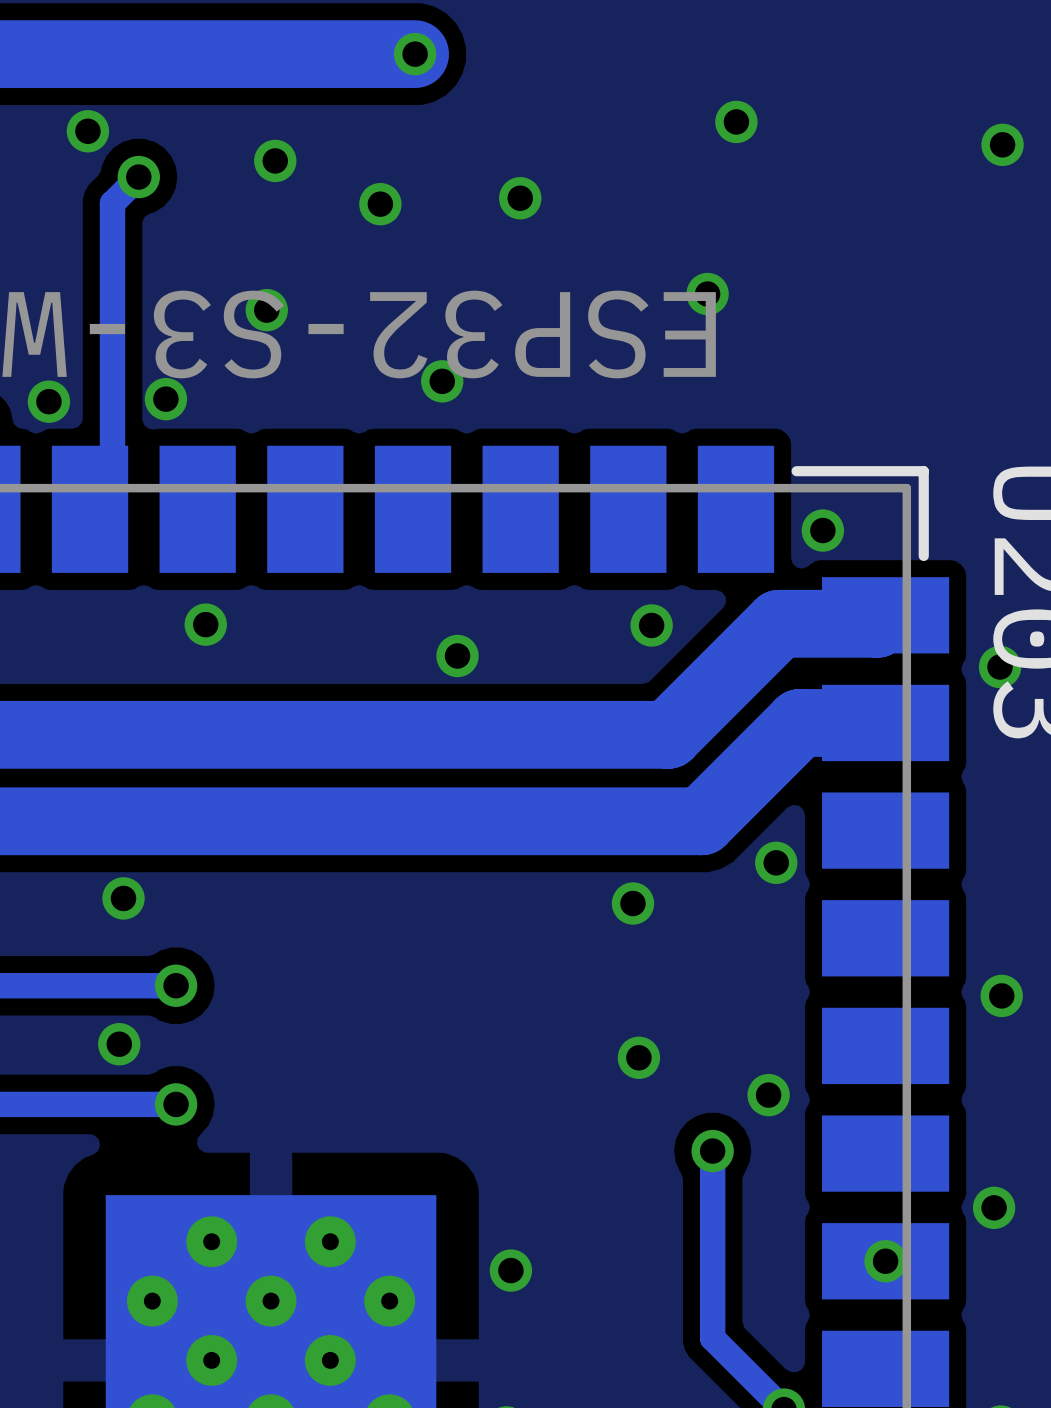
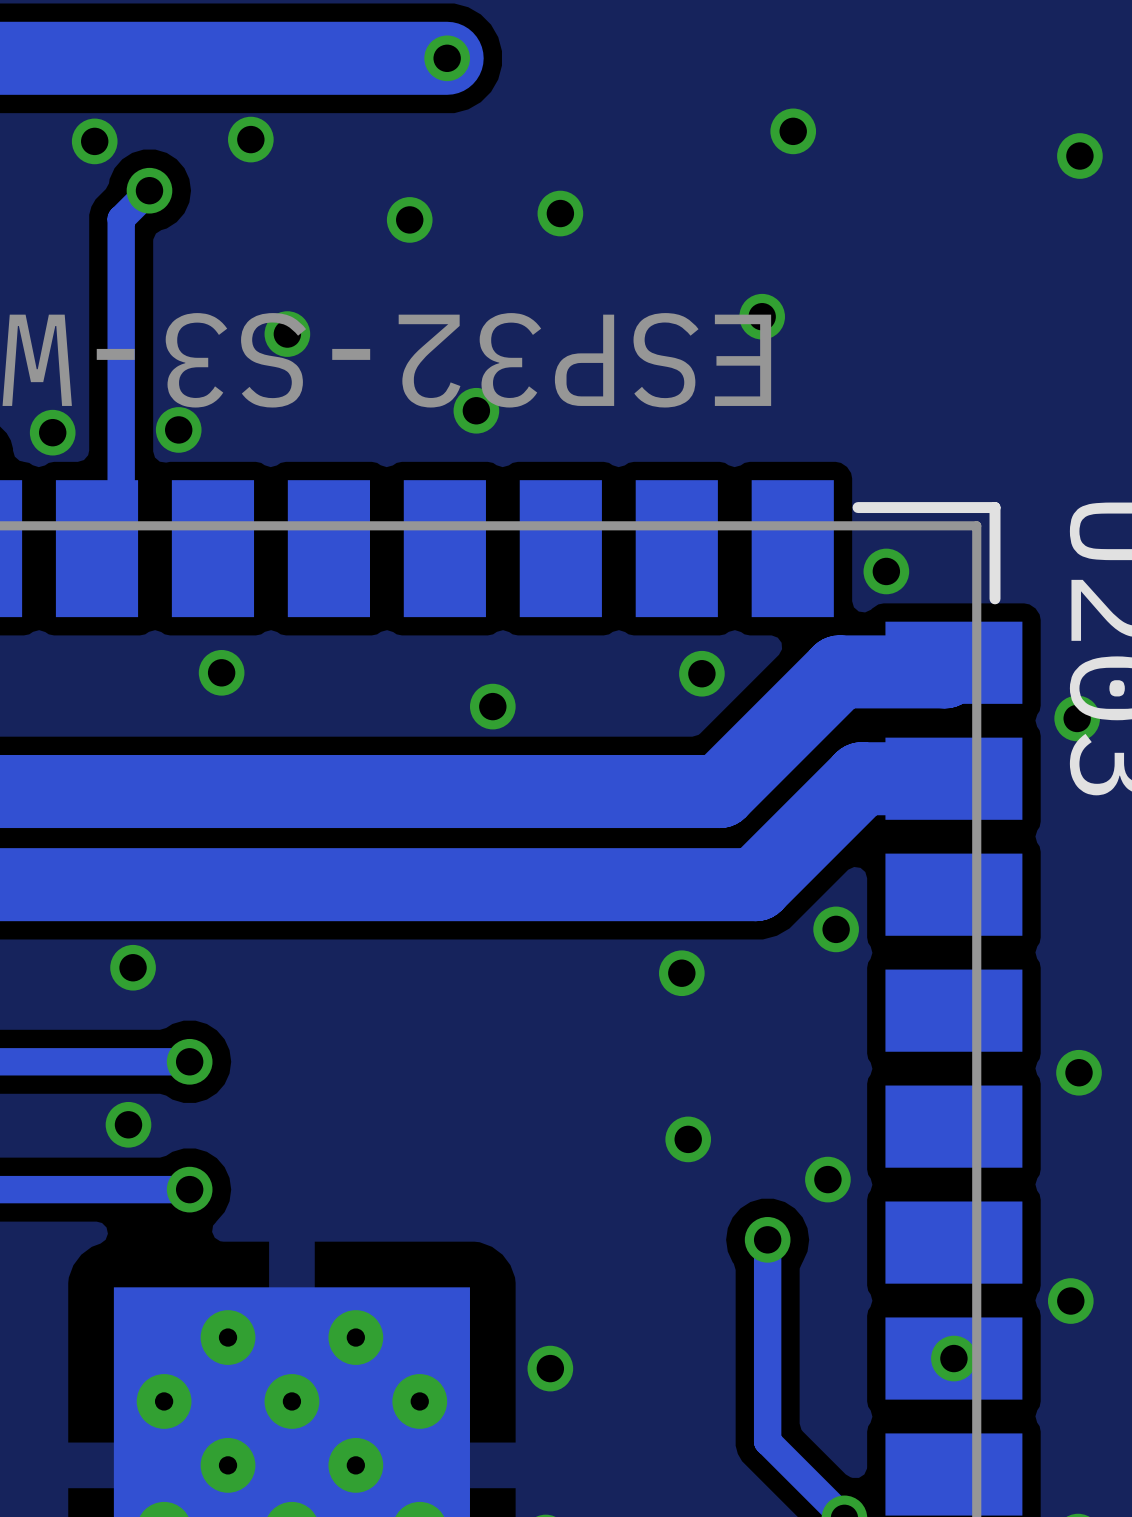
via position: (275, 160) -> (250, 139)

